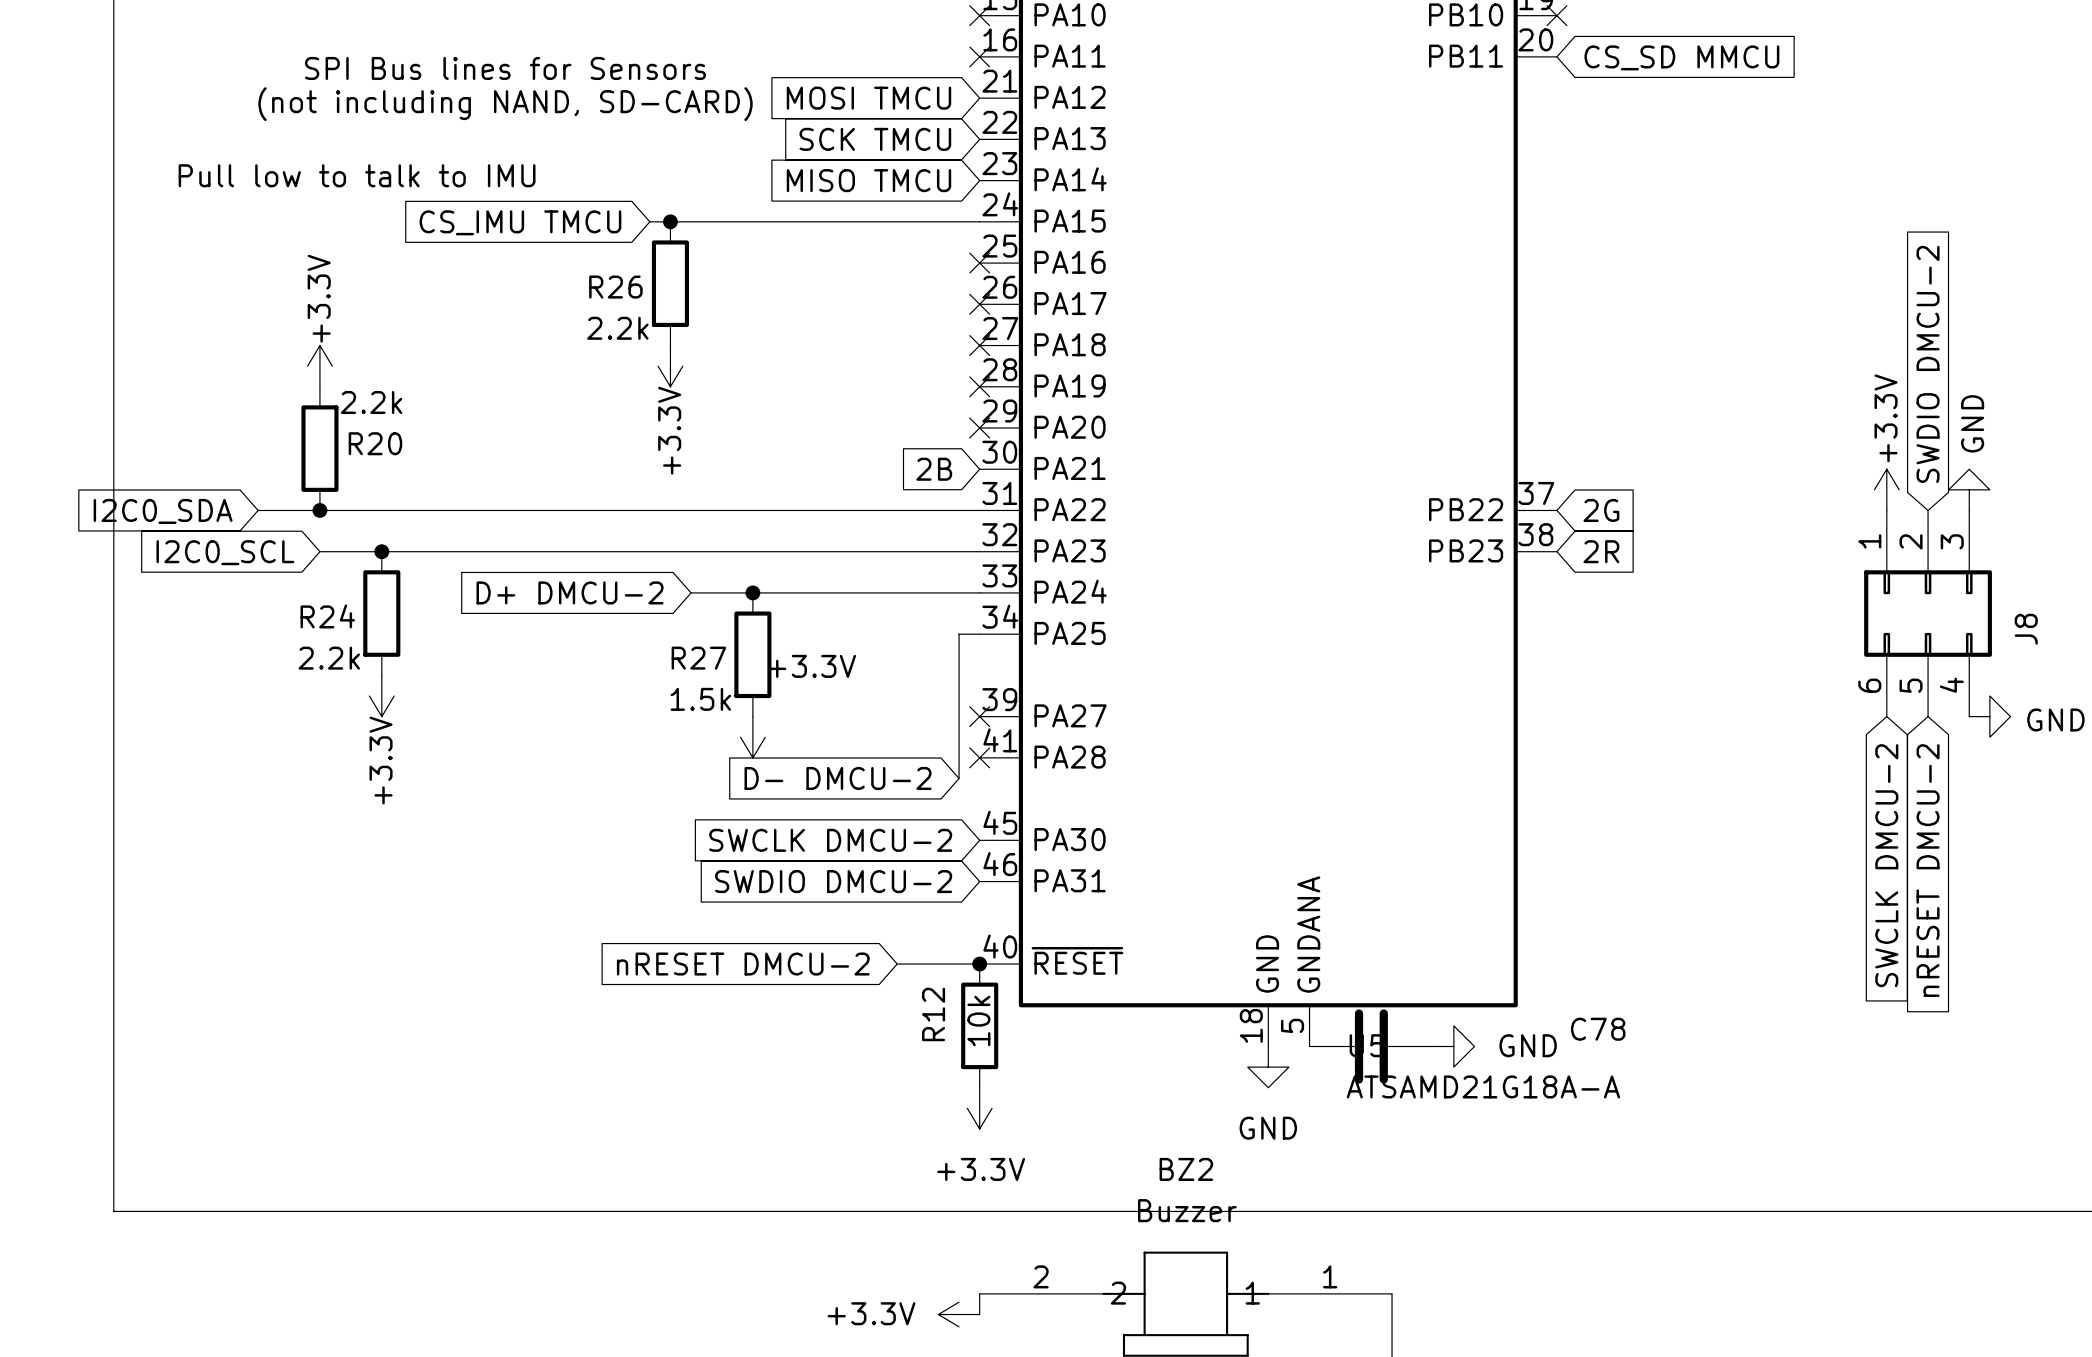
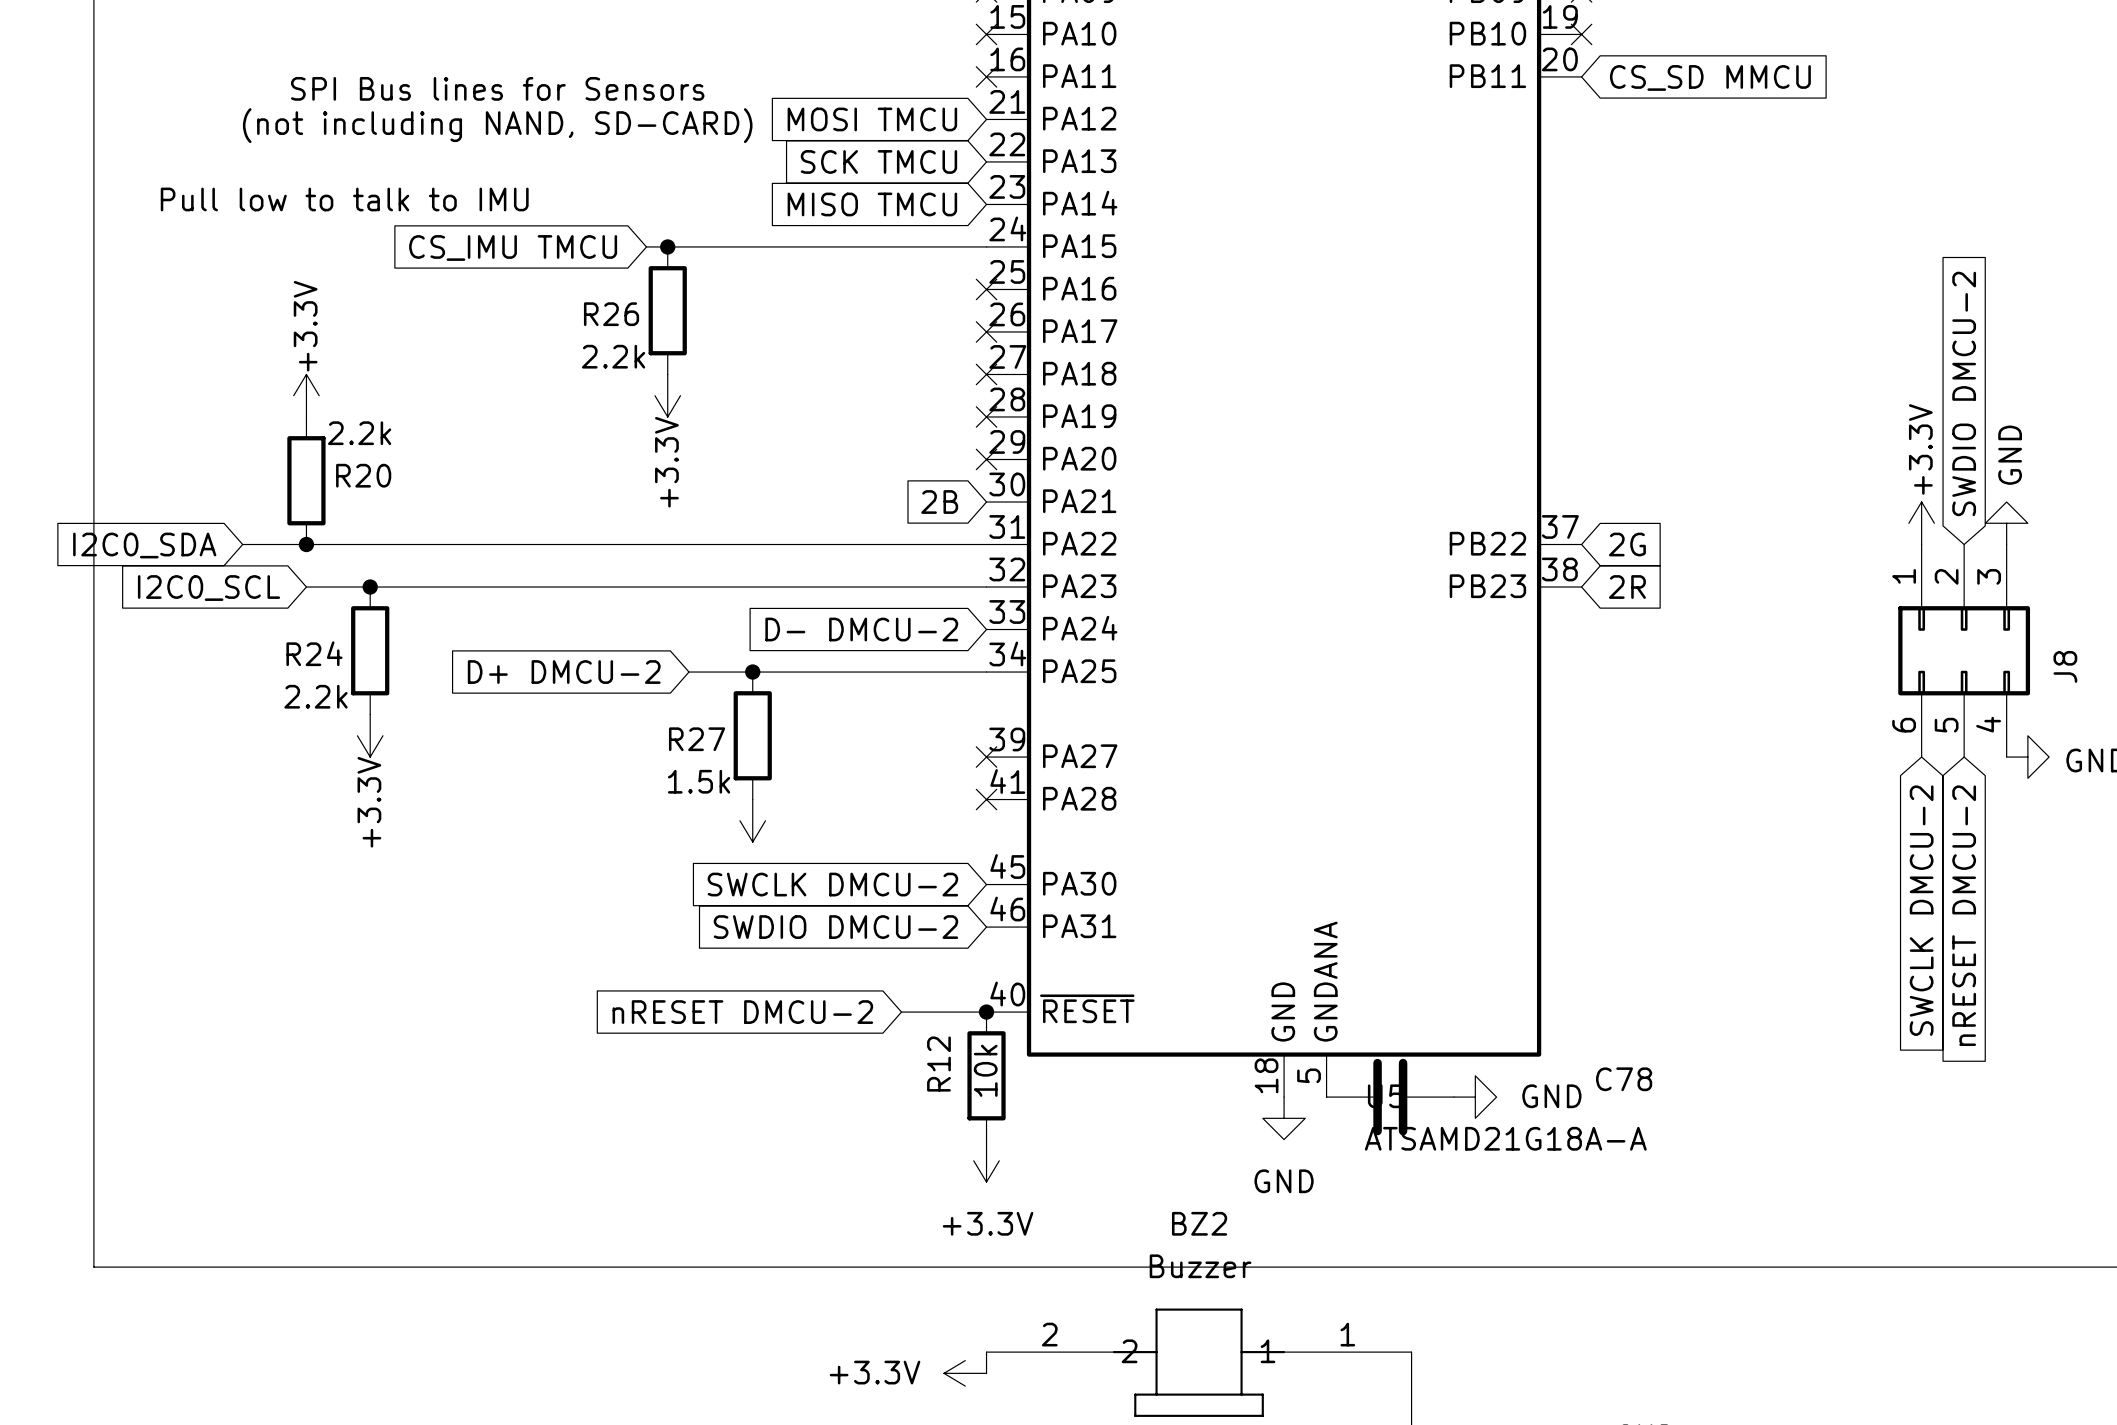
global label position: D+ DMCU-2 (570, 592) -> D+ DMCU-2 (564, 672)
wire: (691, 592) (979, 592) -> none
junction position: (752, 592) -> (752, 672)
wire: (959, 634) (959, 778) -> (965, 672) (688, 672)
R27 position: (752, 654) -> (752, 735)
power symbol: +3.3V (752, 737) -> none
power symbol: none -> (752, 820)
global label position: D- DMCU-2 (838, 778) -> D- DMCU-2 (861, 629)

